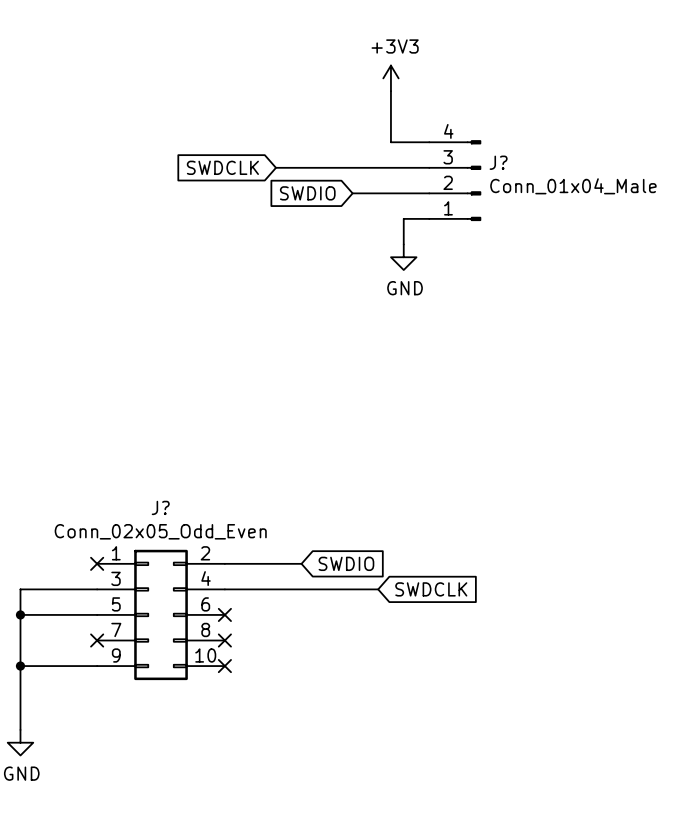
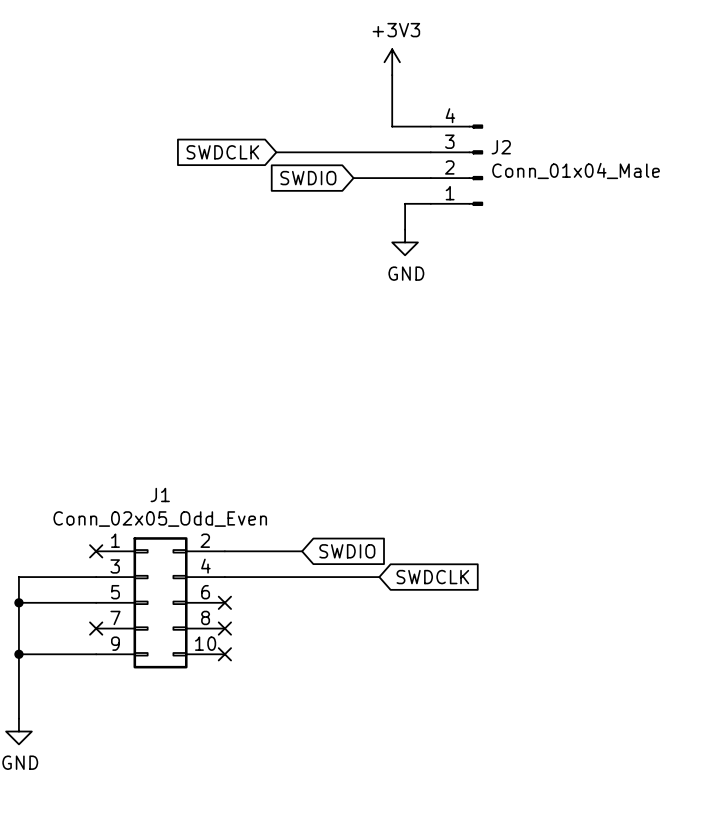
J? name: J? (498, 162) -> J2 (501, 147)
J? name: J? (160, 507) -> J1 (160, 494)

